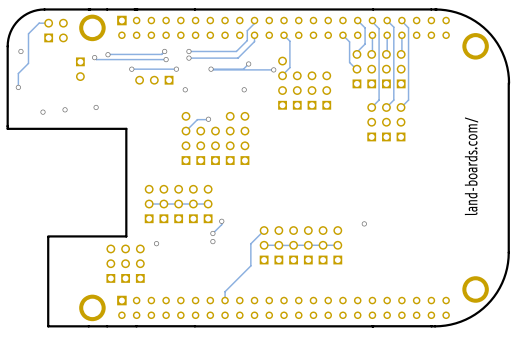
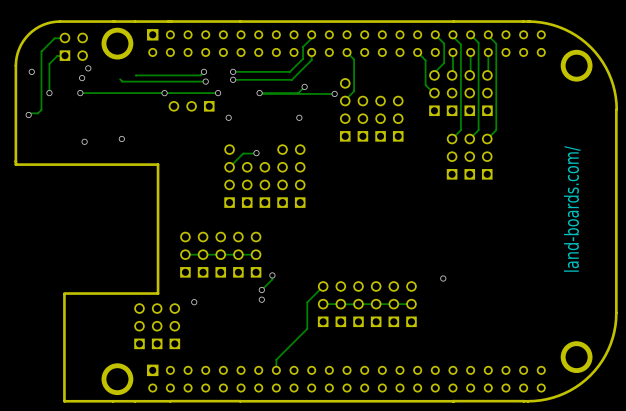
track: (48, 23) (39, 23) (28, 33) (28, 63) (18, 73) (18, 87) -> none
track: none -> (65, 38) (54, 38) (41, 51) (41, 109) (37, 113) (28, 113)
track: none -> (65, 55) (57, 55) (49, 63) (49, 93)
via: none -> (88, 68)
via: (107, 54) -> none
via: none -> (82, 78)
via: (94, 57) -> none
via: none -> (49, 93)
via: none -> (80, 93)
part: (80, 69) -> none
track: none -> (164, 93) (80, 93)
via: (43, 112) -> none

